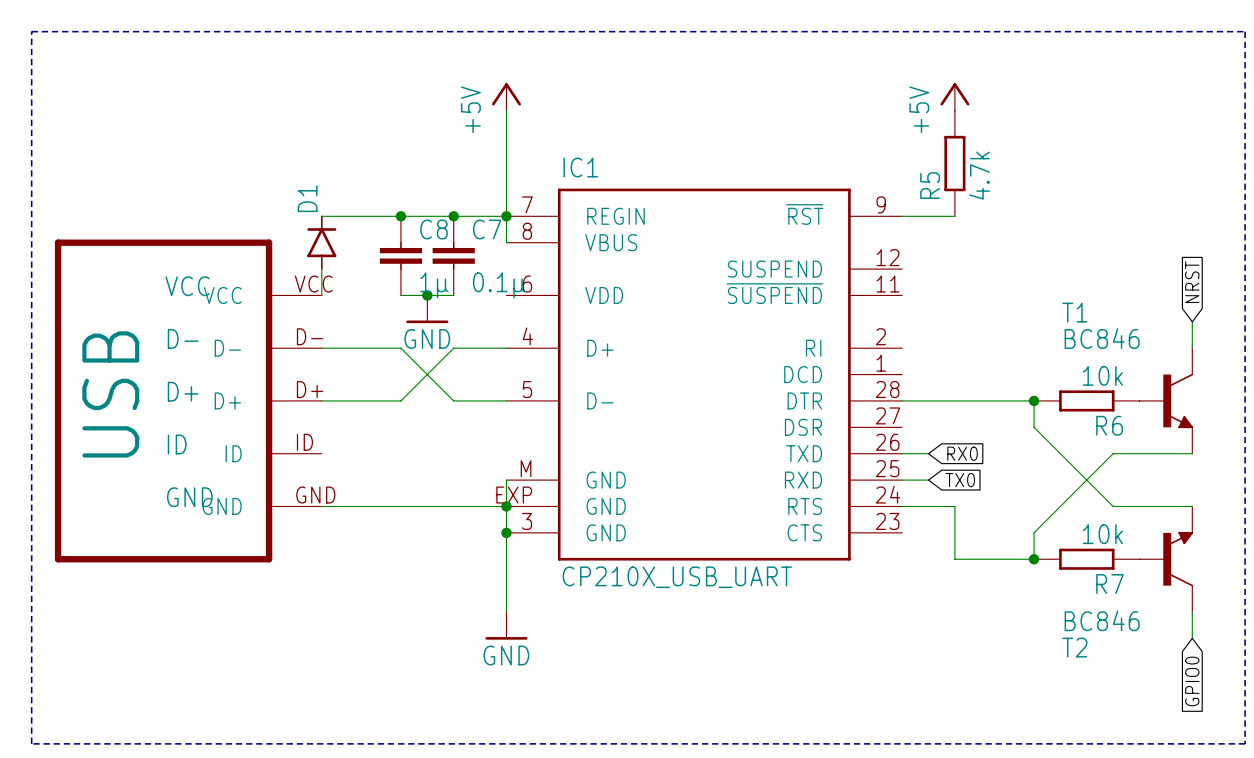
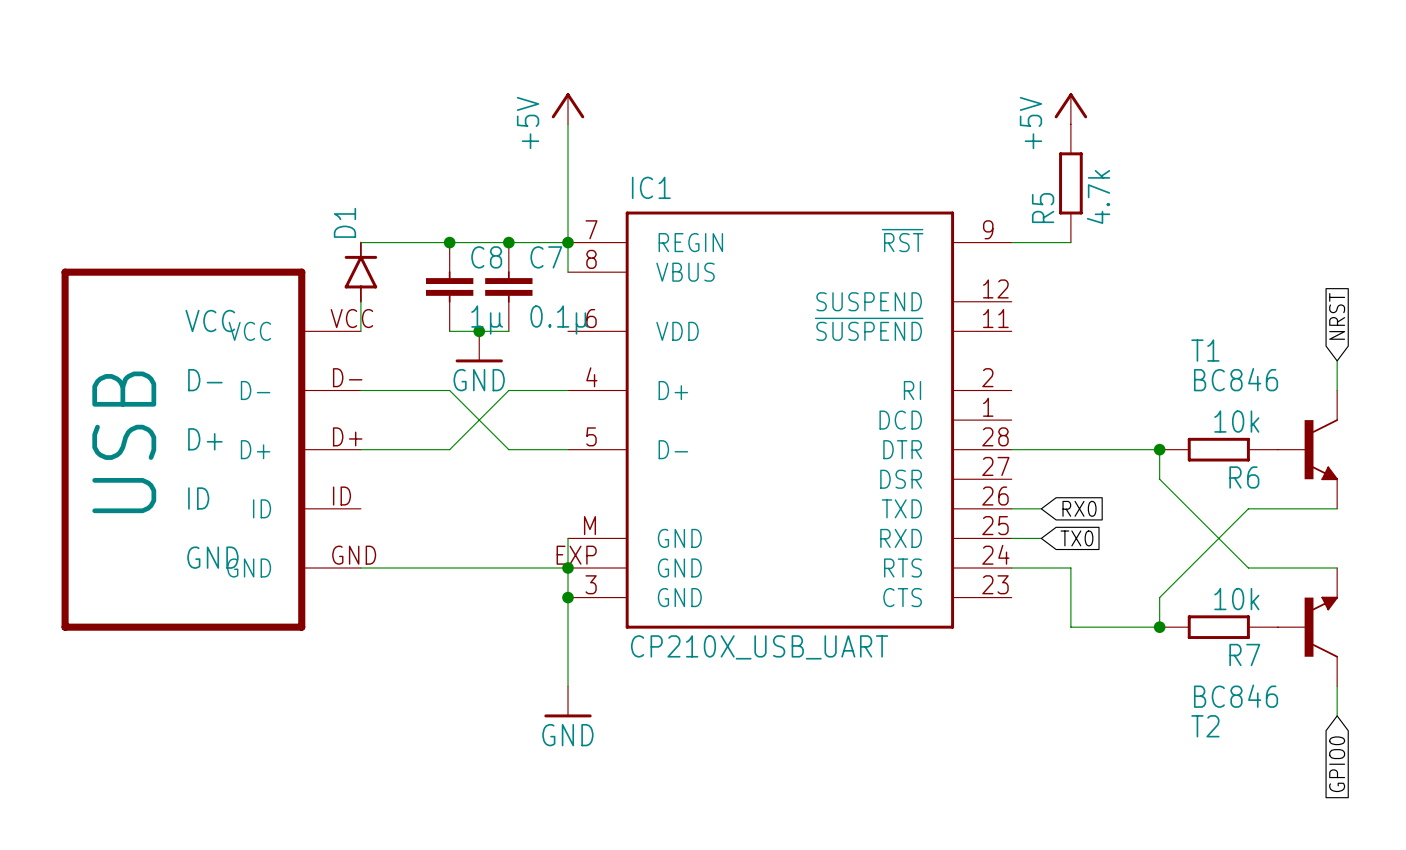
line: (31, 31) (1245, 31) (1245, 743) (31, 743) (31, 31) -> none

